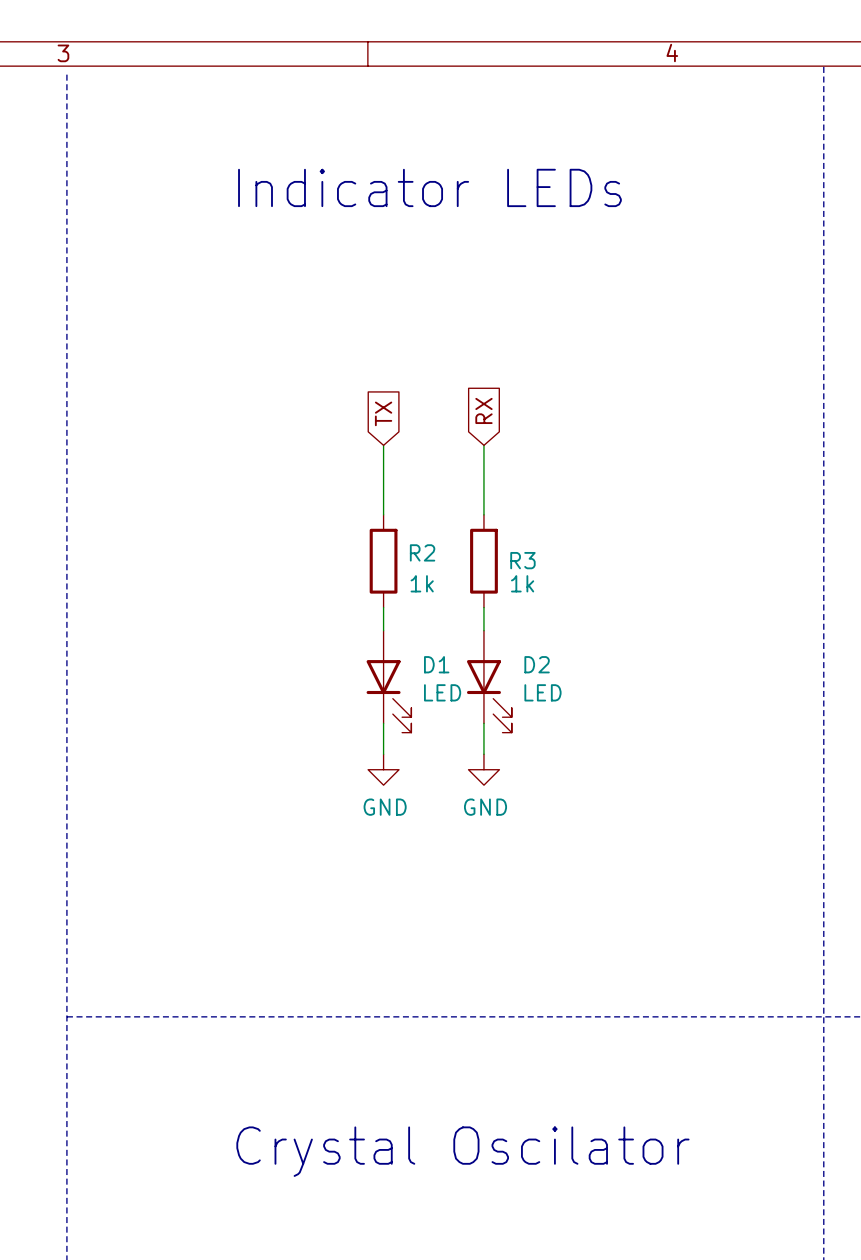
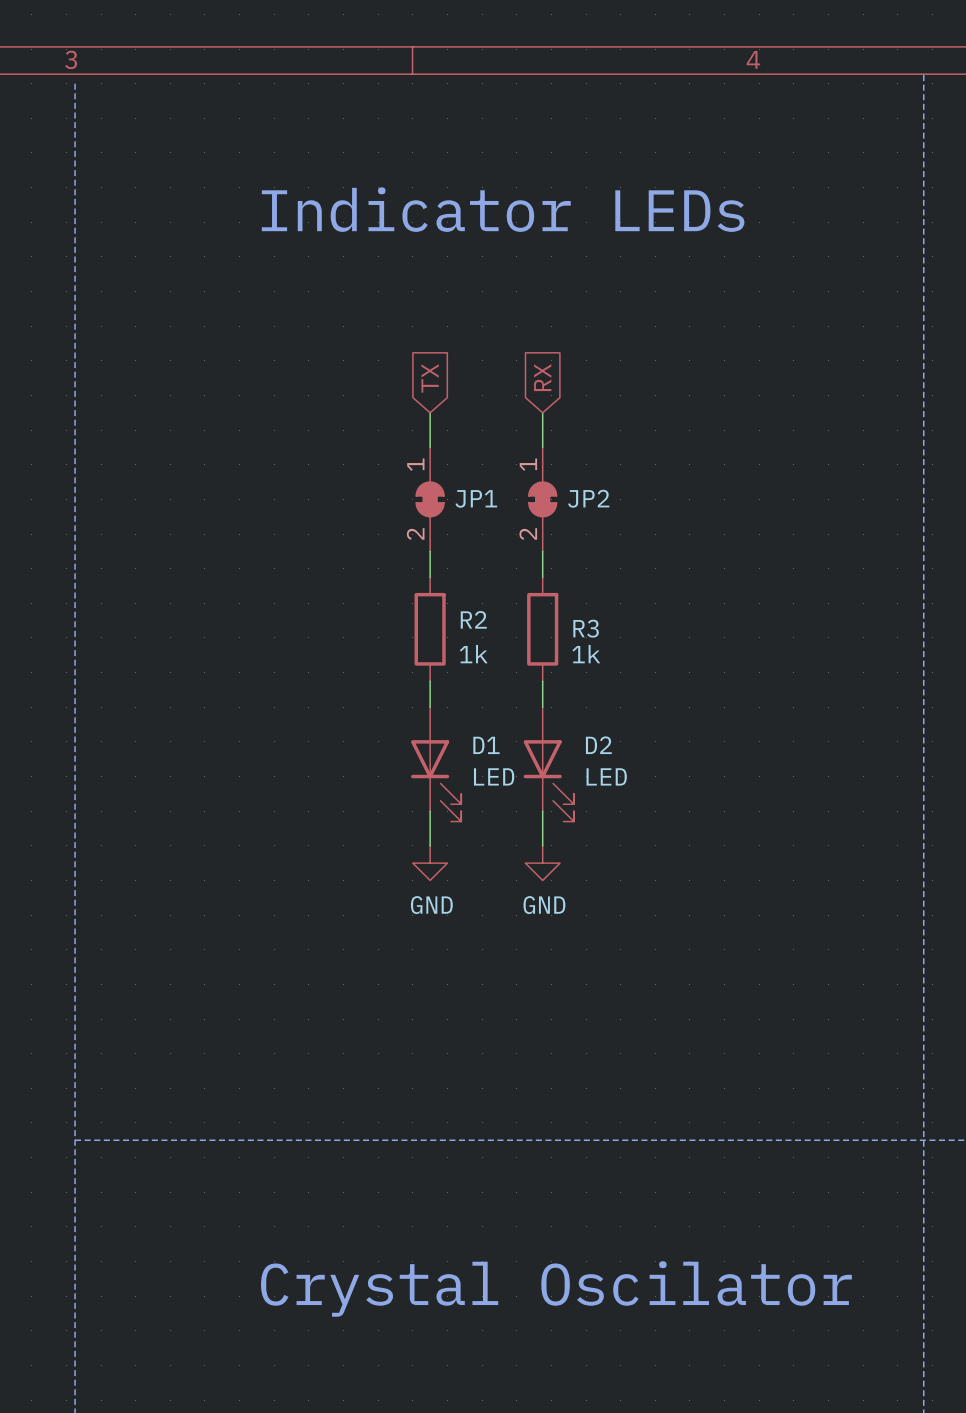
wire: none -> (430, 412) (430, 447)
wire: none -> (542, 412) (542, 447)
global label position: RX (483, 410) -> RX (542, 377)
global label position: TX (383, 413) -> TX (430, 378)
JP1: none -> (430, 499)
JP2: none -> (542, 499)

